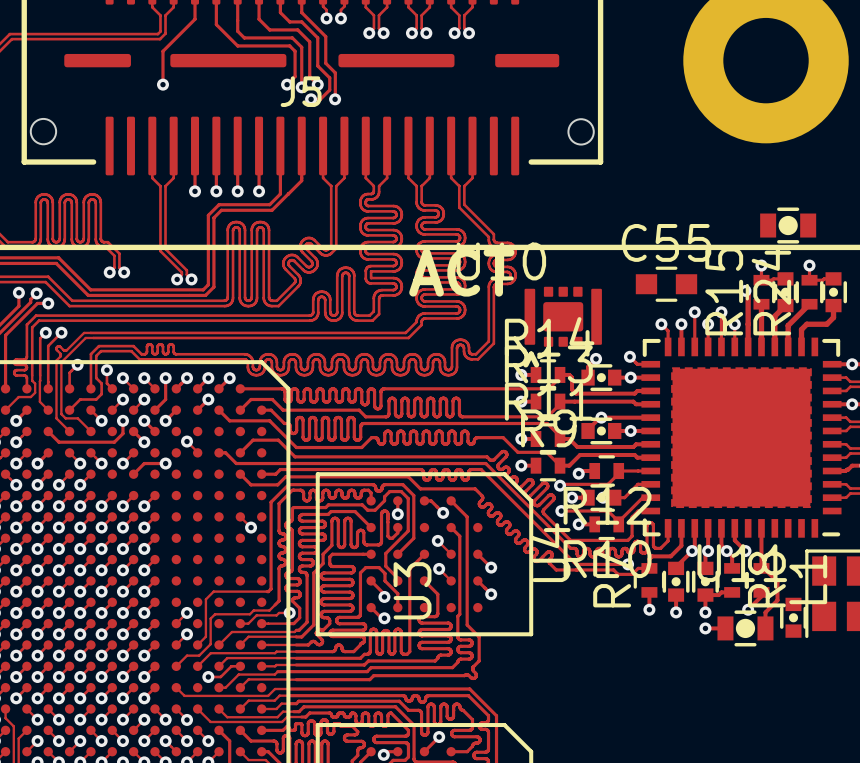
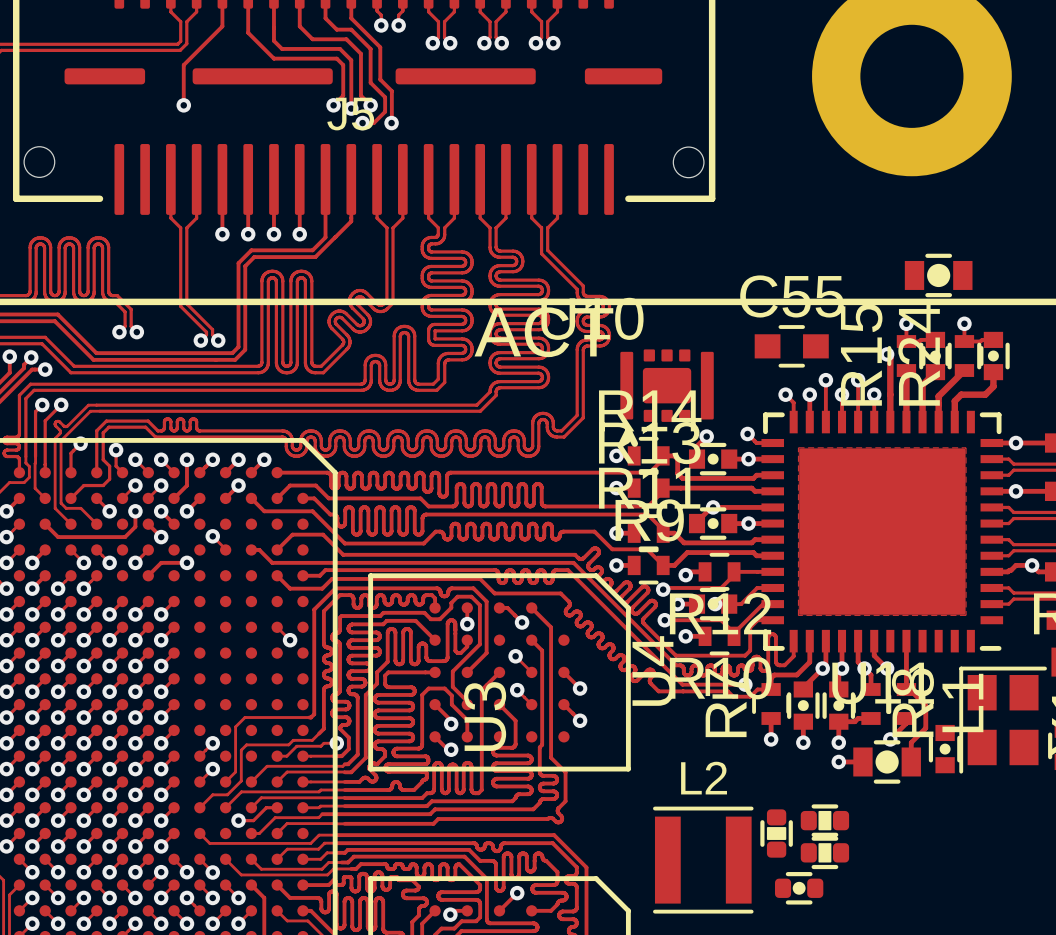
part: none -> (824, 820)
part: none -> (776, 833)
part: none -> (824, 852)
L2: none -> (703, 860)
part: none -> (799, 888)

